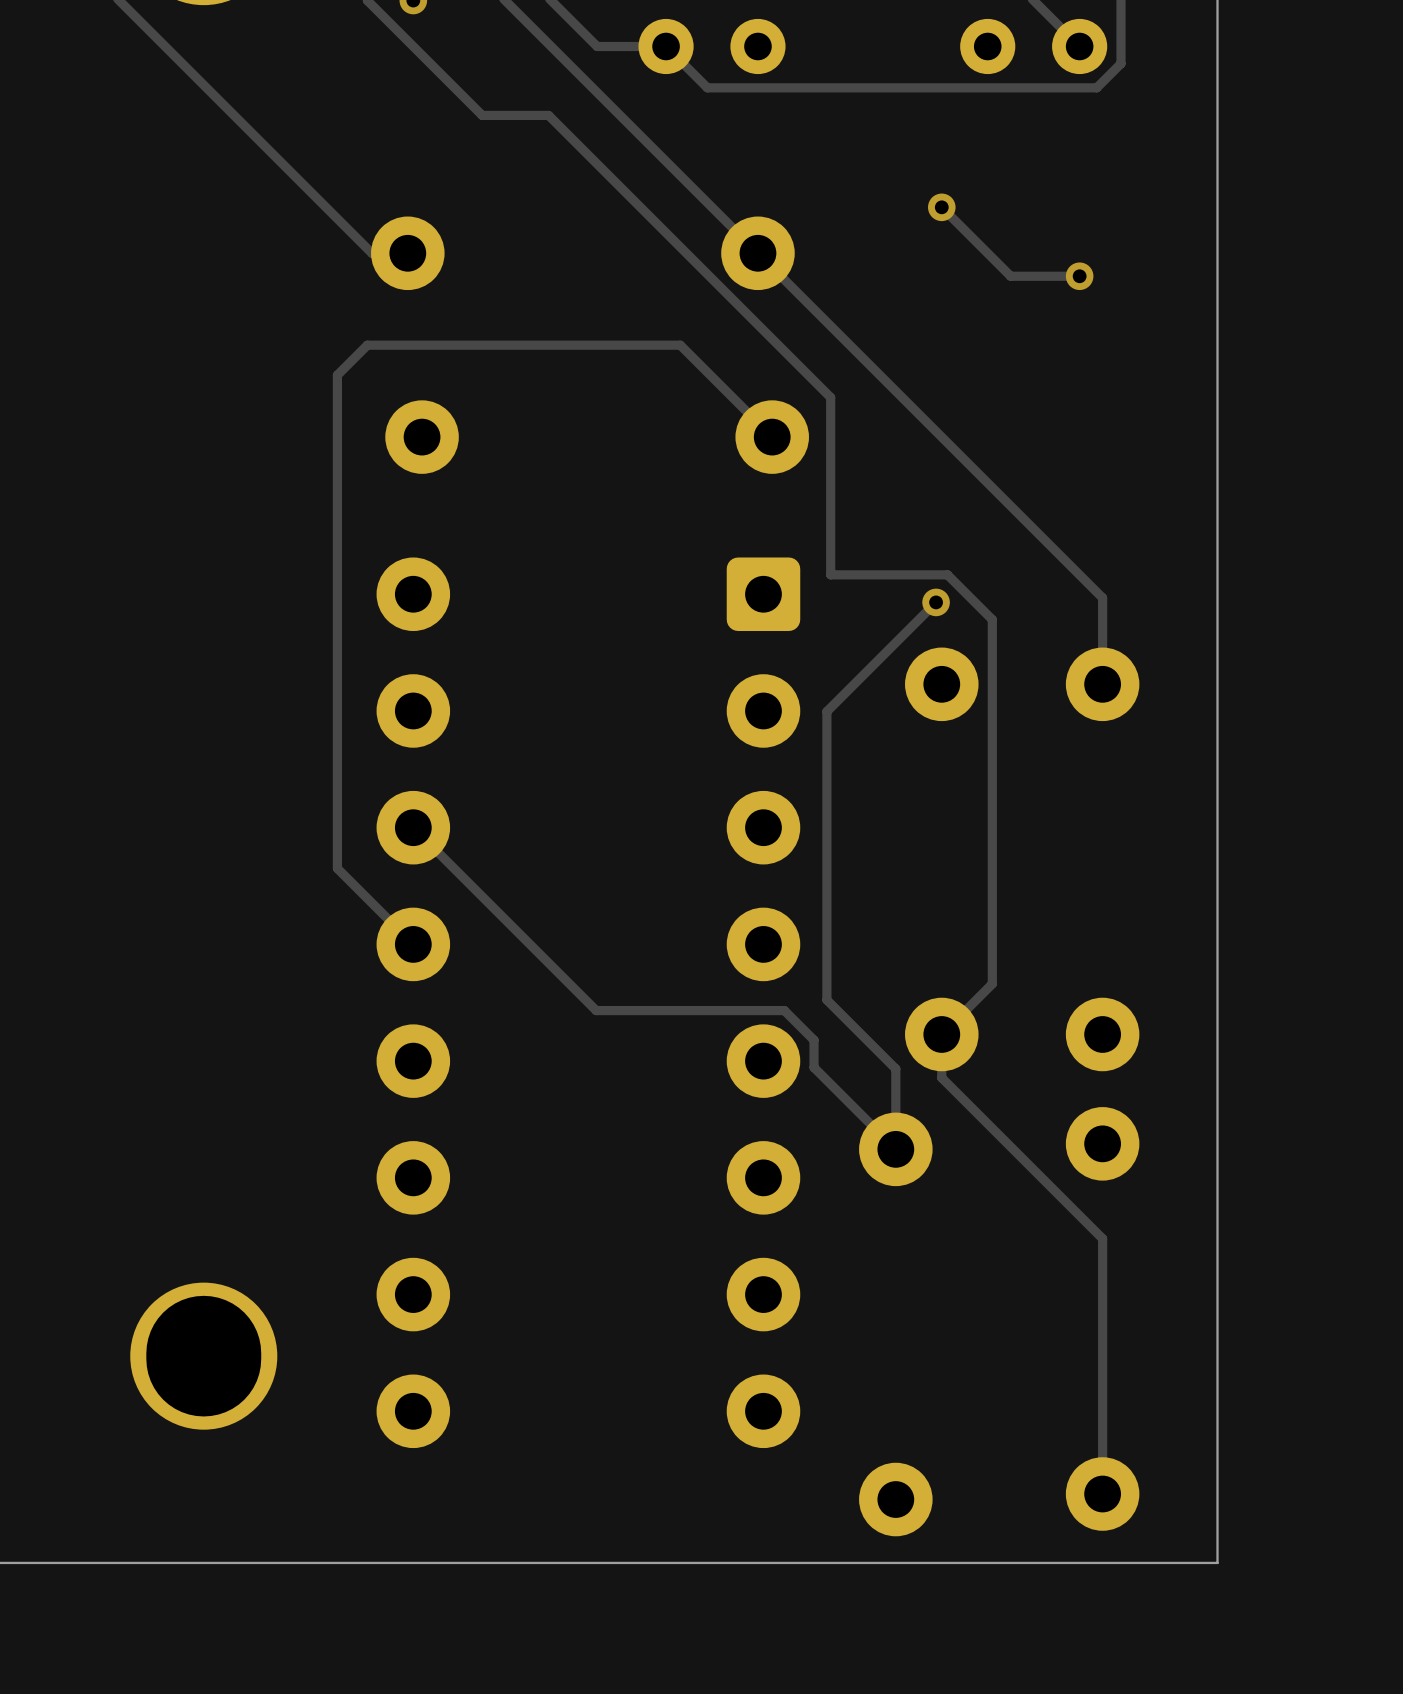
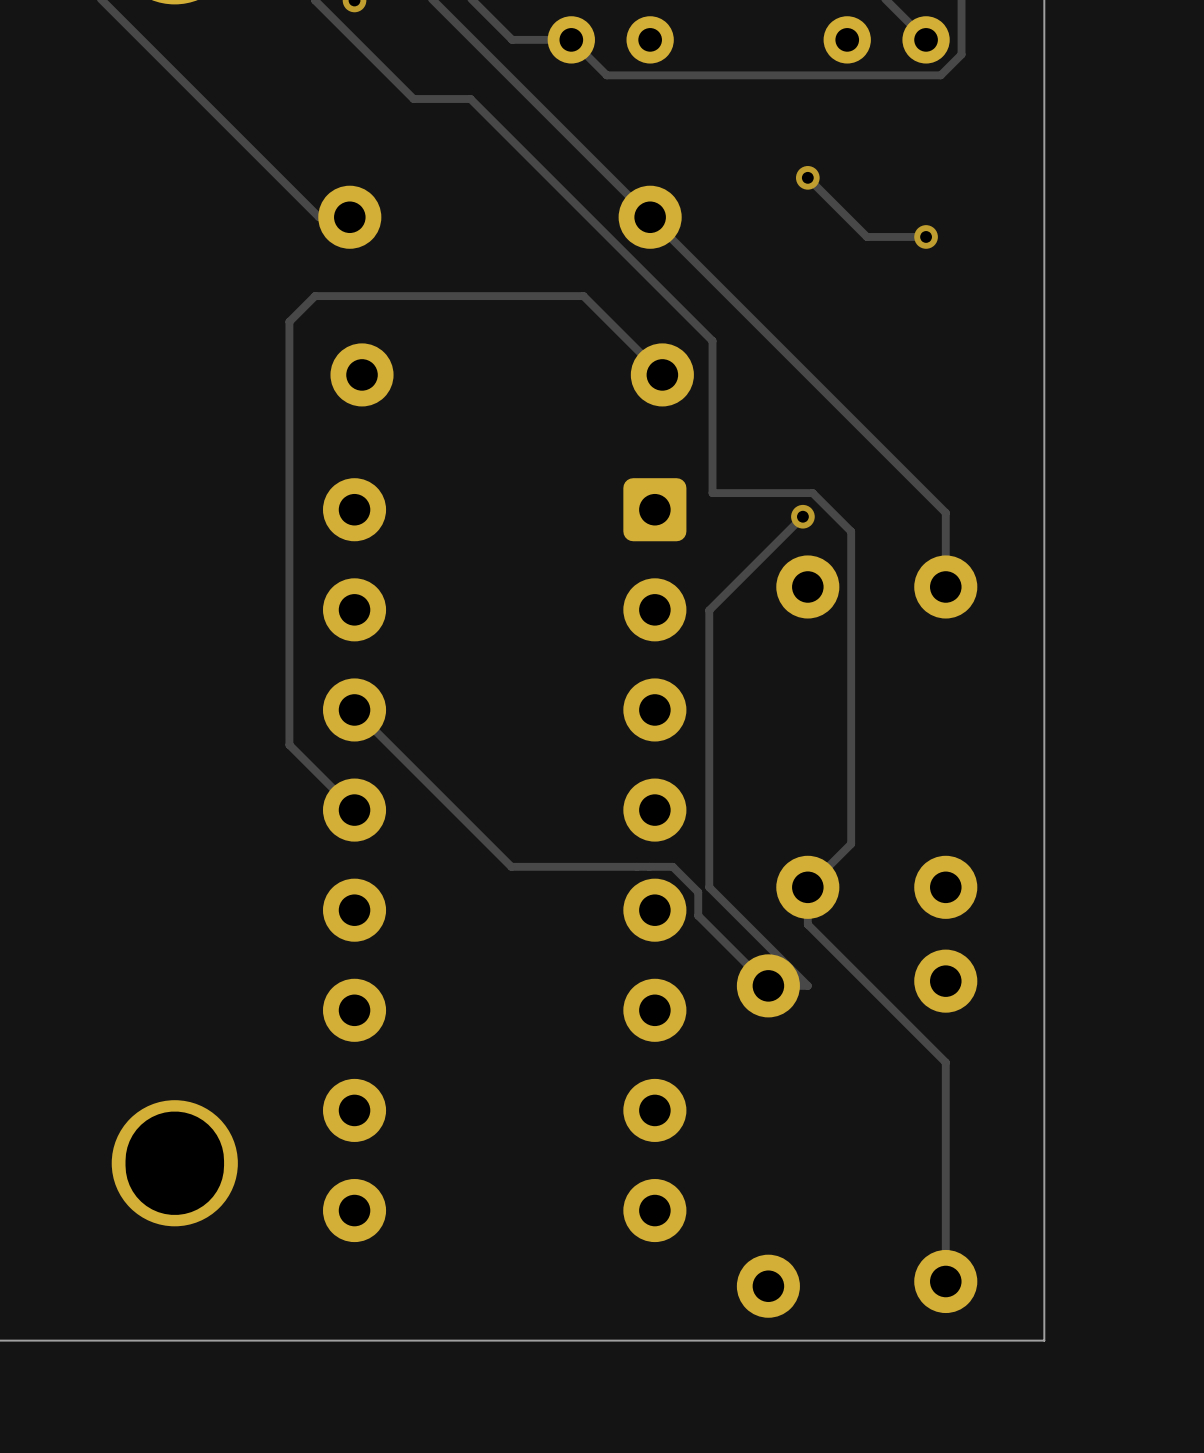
track: (826, 1000) (895, 1068) (895, 1149) -> (709, 857) (709, 887) (807, 985) (768, 985)

